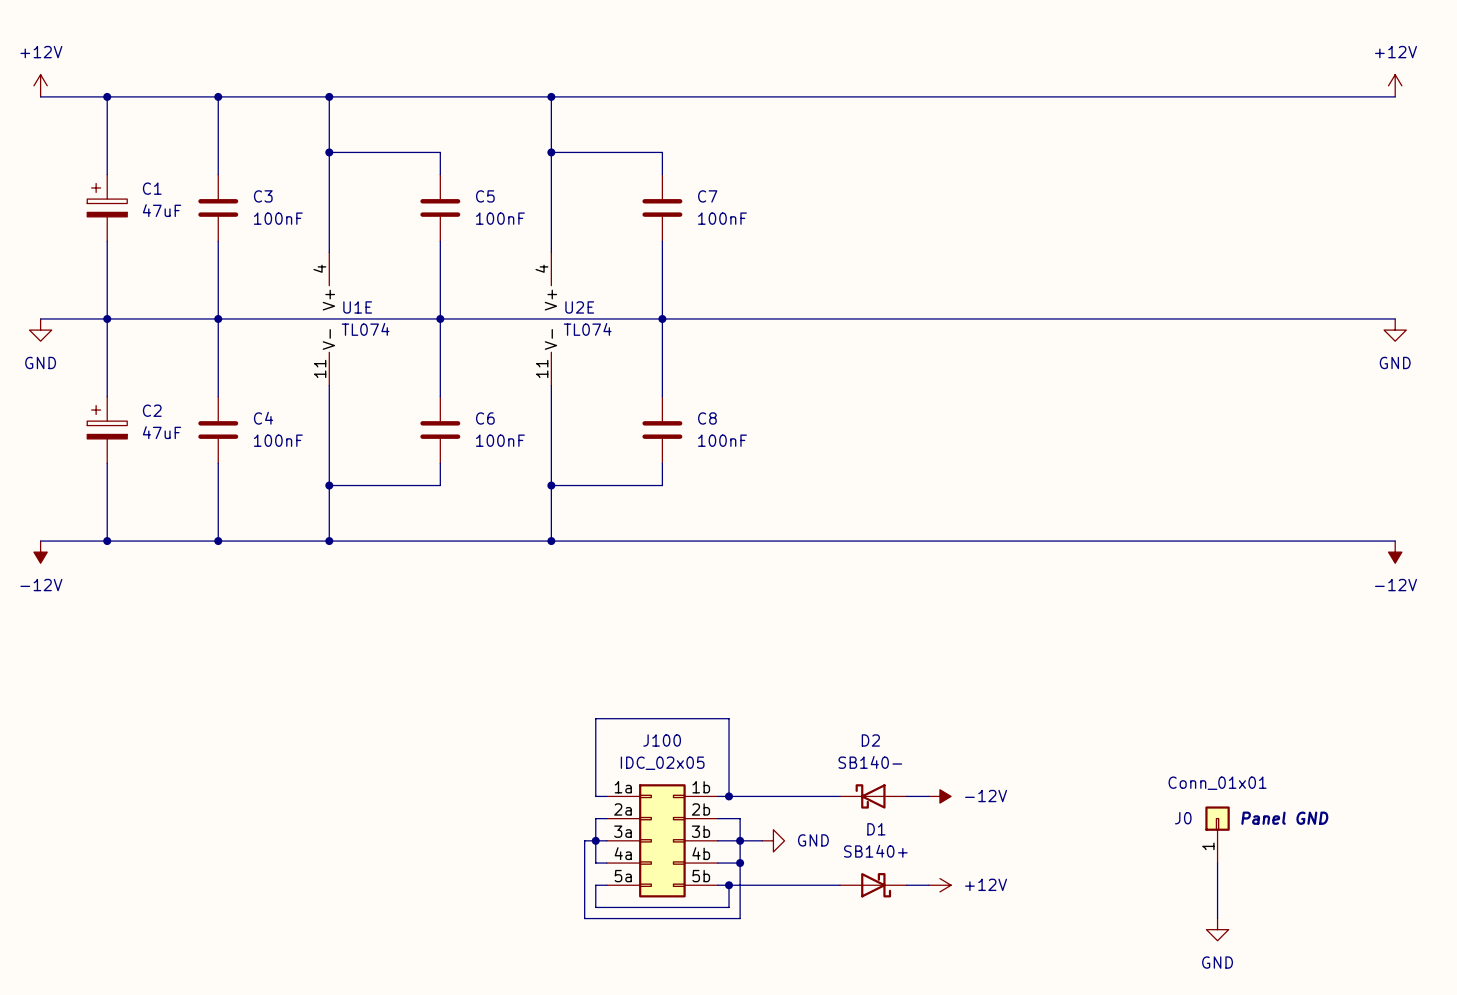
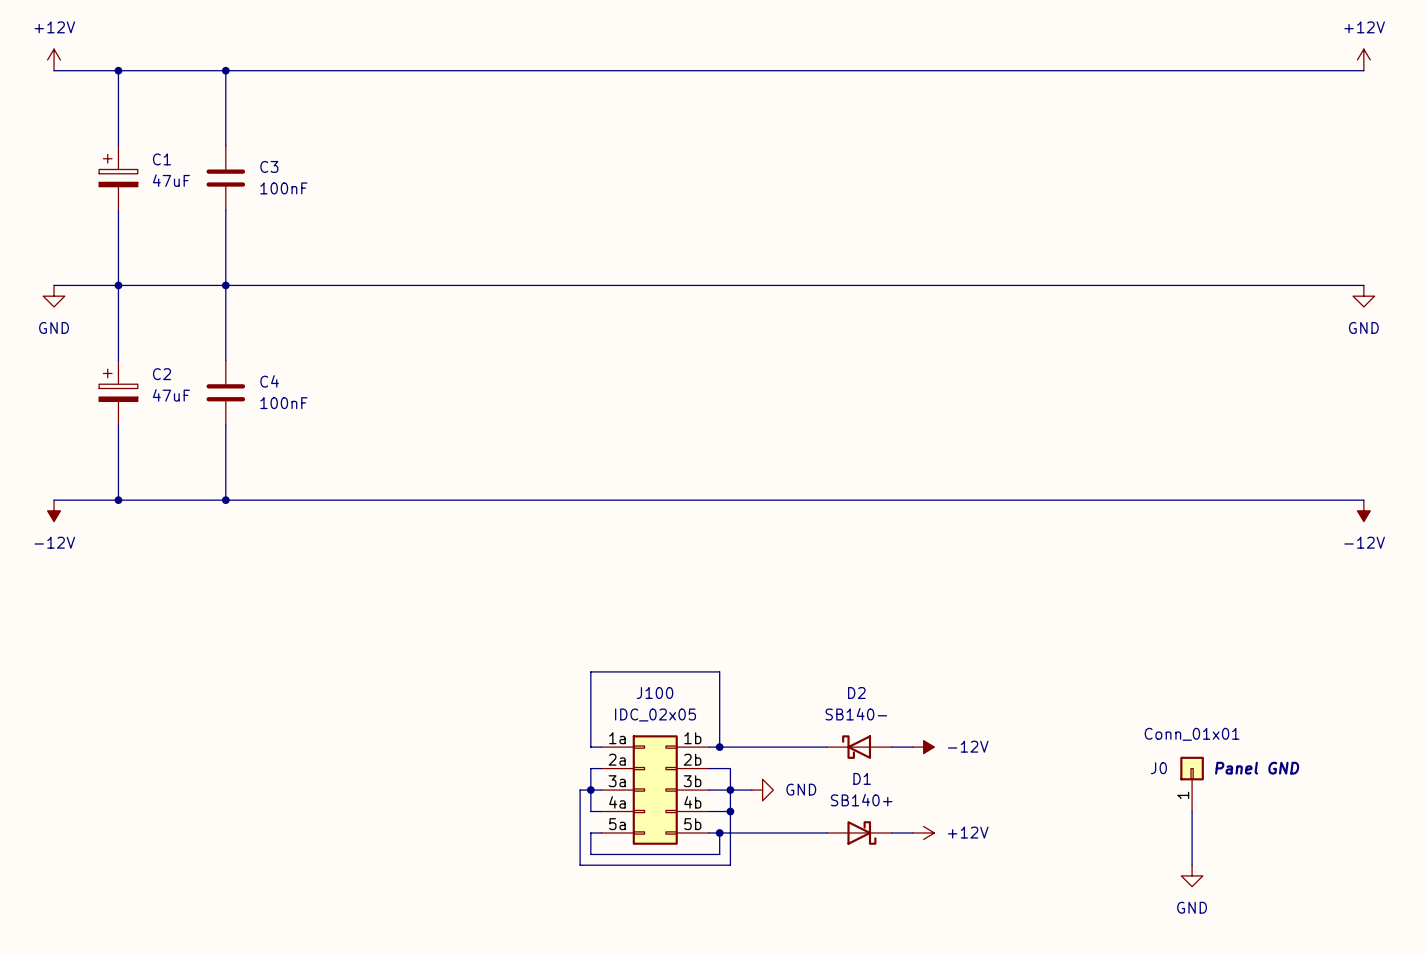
wire: (329, 96) (329, 252) -> none
junction: (329, 96) -> none
wire: (551, 96) (551, 252) -> none
junction: (551, 96) -> none
wire: (329, 152) (440, 152) (440, 174) -> none
junction: (329, 152) -> none
wire: (551, 152) (662, 152) (662, 174) -> none
junction: (551, 152) -> none
C5: 100nF (440, 207) -> none
C7: 100nF (662, 207) -> none
wire: (440, 241) (440, 396) -> none
wire: (662, 241) (662, 396) -> none
U1E: TL074 (329, 318) -> none
junction: (440, 318) -> none
U2E: TL074 (551, 318) -> none
junction: (662, 318) -> none
wire: (329, 385) (329, 541) -> none
wire: (551, 385) (551, 541) -> none
C6: 100nF (440, 430) -> none
C8: 100nF (662, 430) -> none
wire: (440, 463) (440, 485) (329, 485) -> none
wire: (662, 463) (662, 485) (551, 485) -> none
junction: (329, 485) -> none
junction: (551, 485) -> none
junction: (329, 541) -> none
junction: (551, 541) -> none

